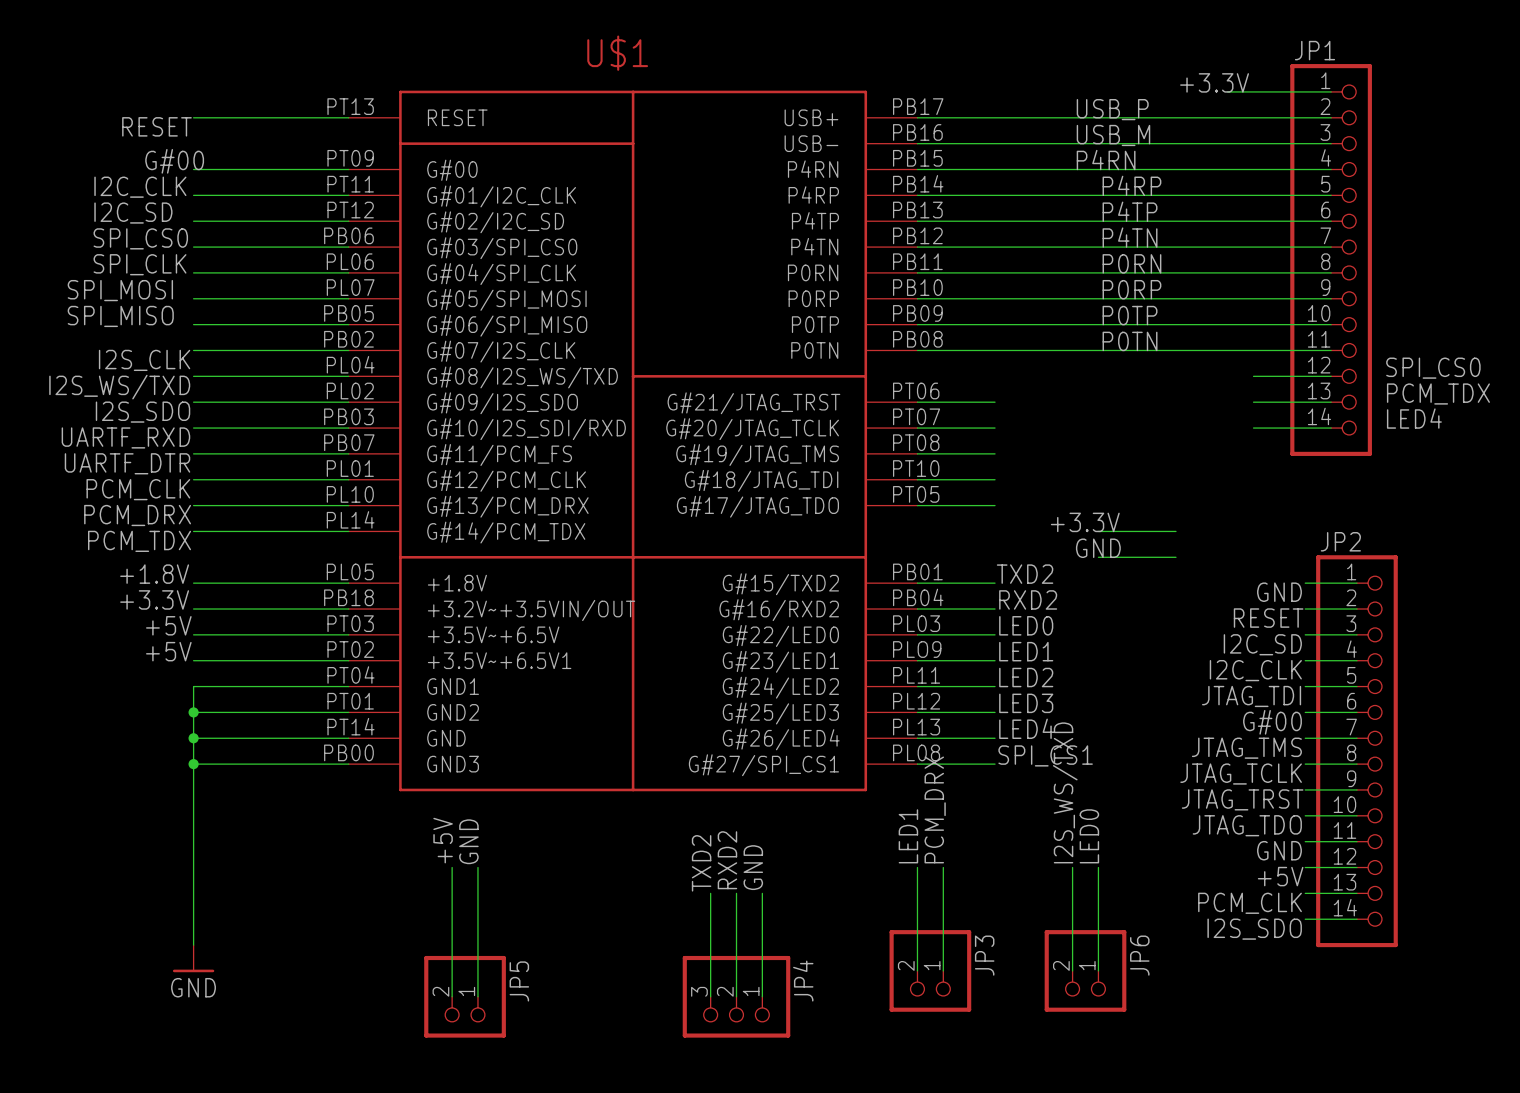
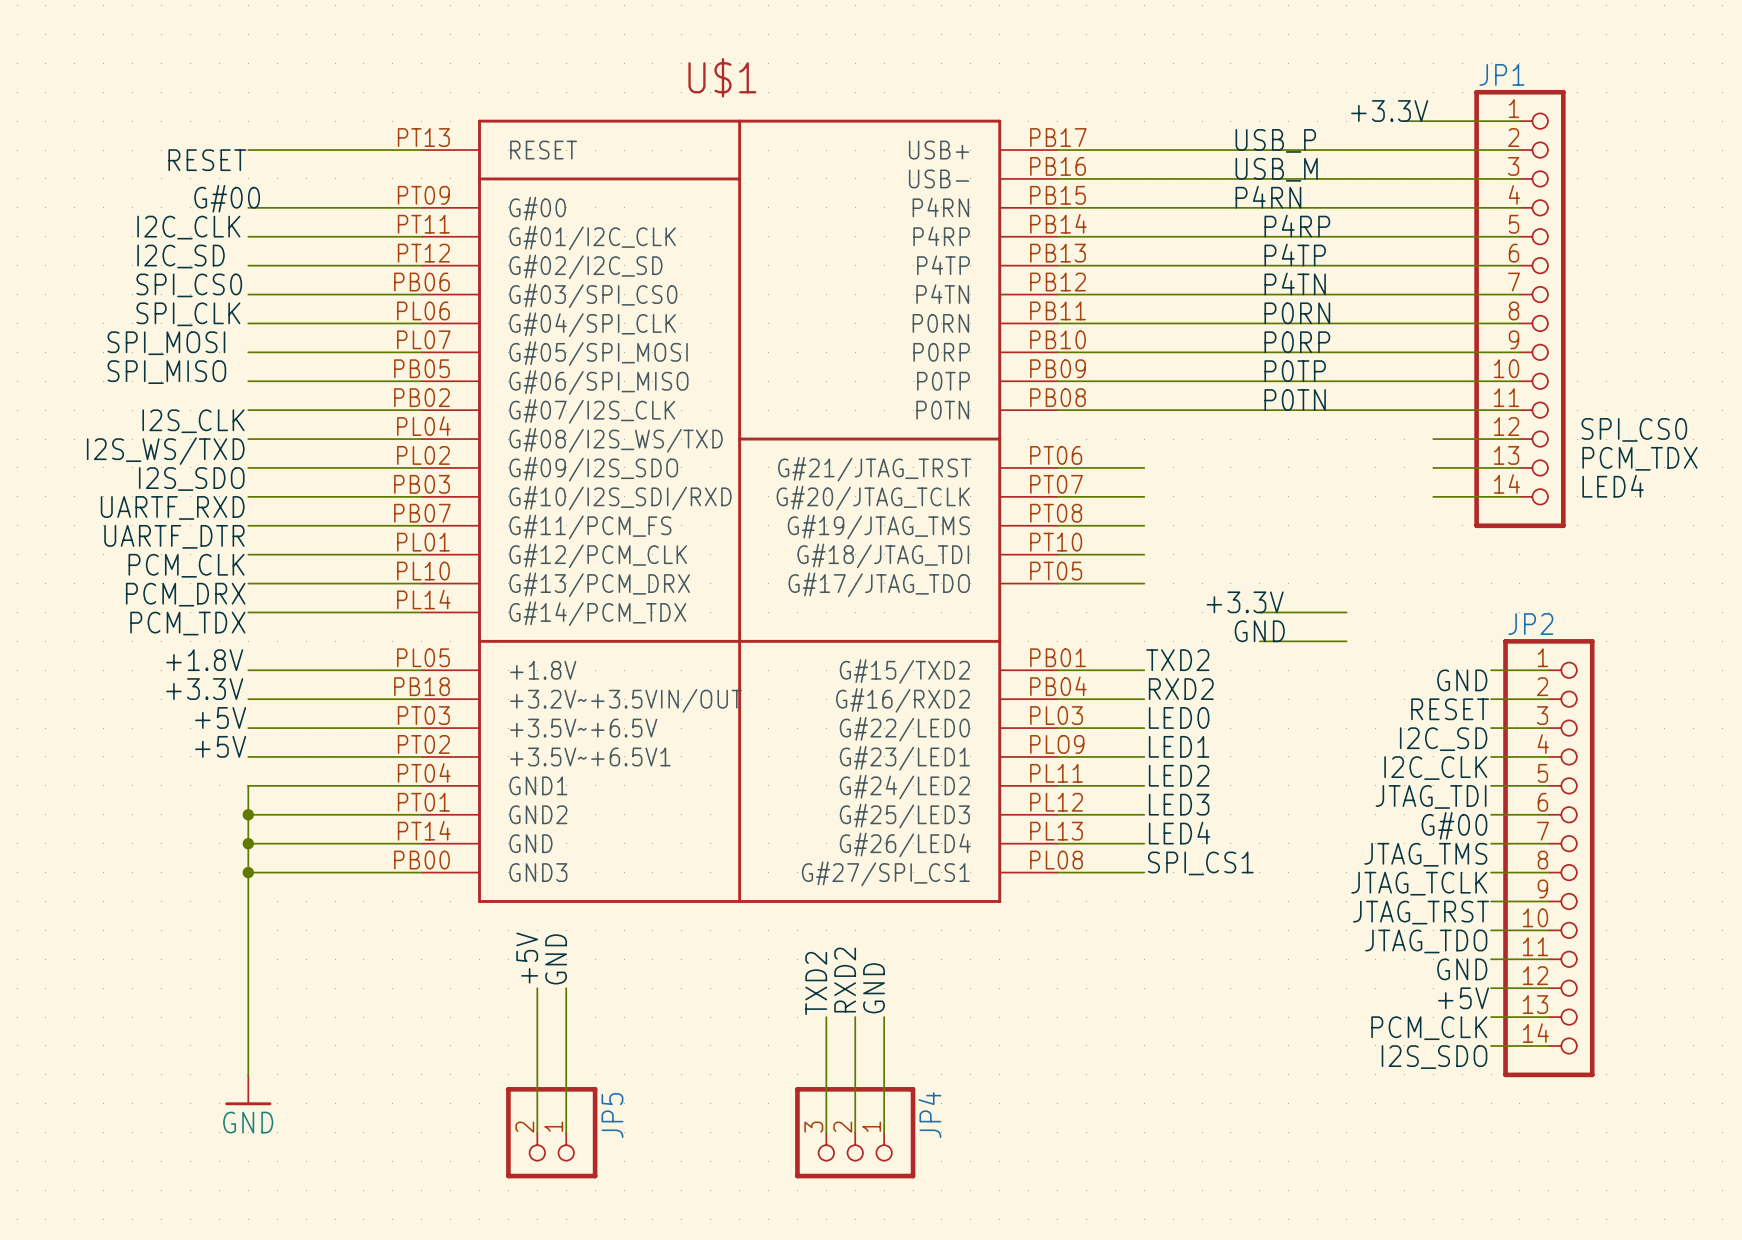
label: I2S_WS/TXD (1065, 792) -> none
label: PCM_DRX (935, 809) -> none
label: LED1 (908, 836) -> none
label: LED0 (1089, 836) -> none
wire: (917, 867) (917, 970) -> none
wire: (943, 867) (943, 970) -> none
wire: (1072, 867) (1072, 970) -> none
wire: (1098, 867) (1098, 970) -> none
JP3: (930, 970) -> none
JP6: (1085, 970) -> none

